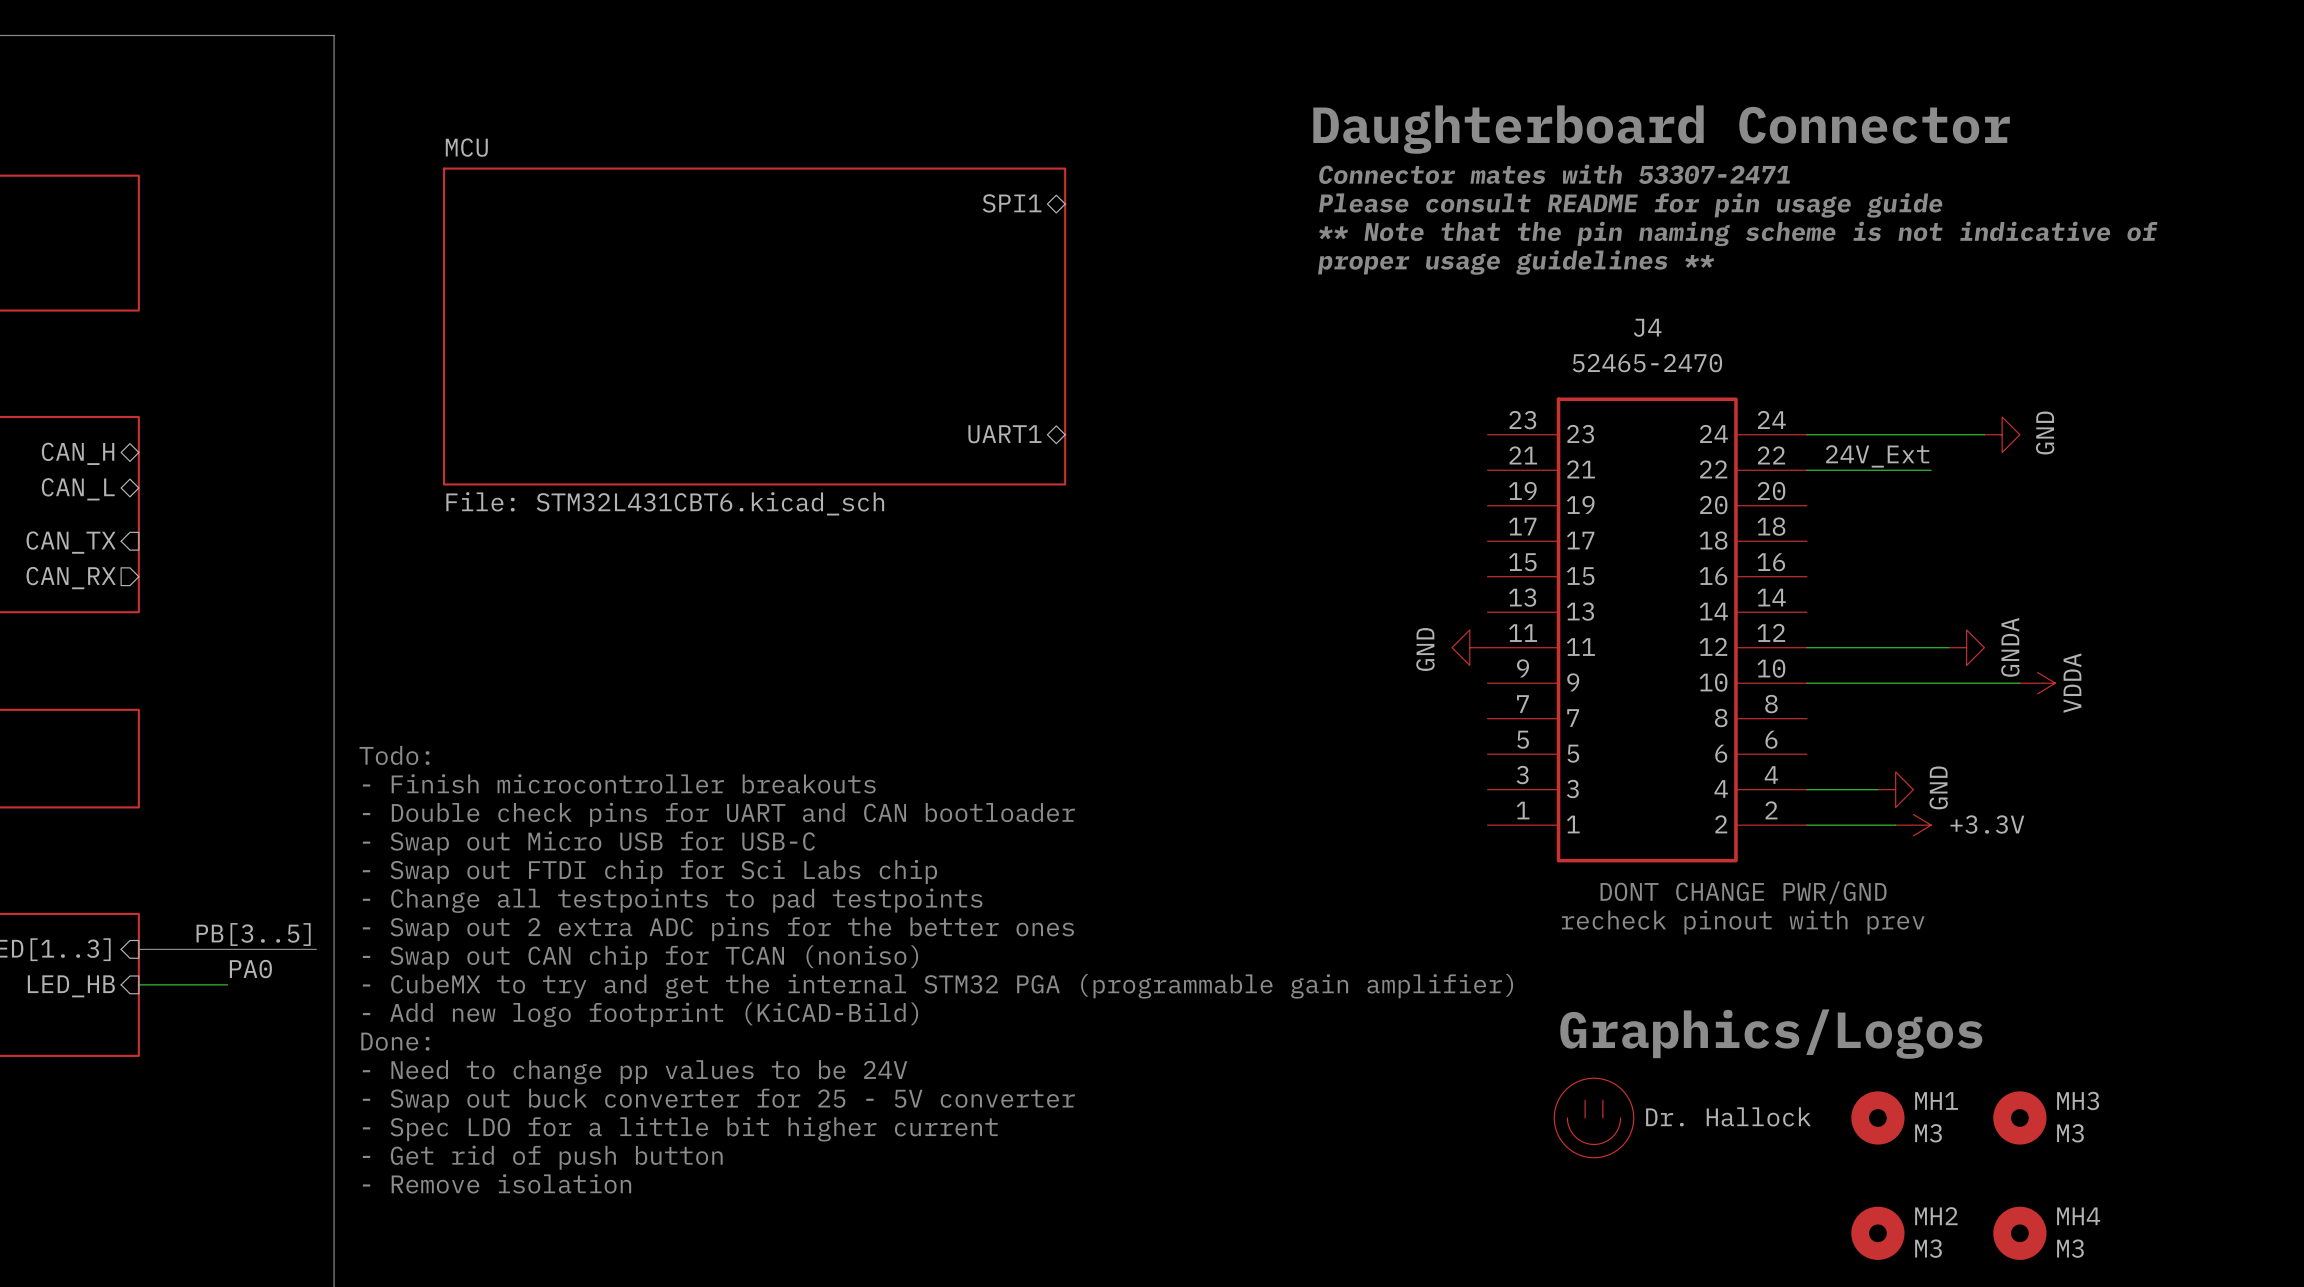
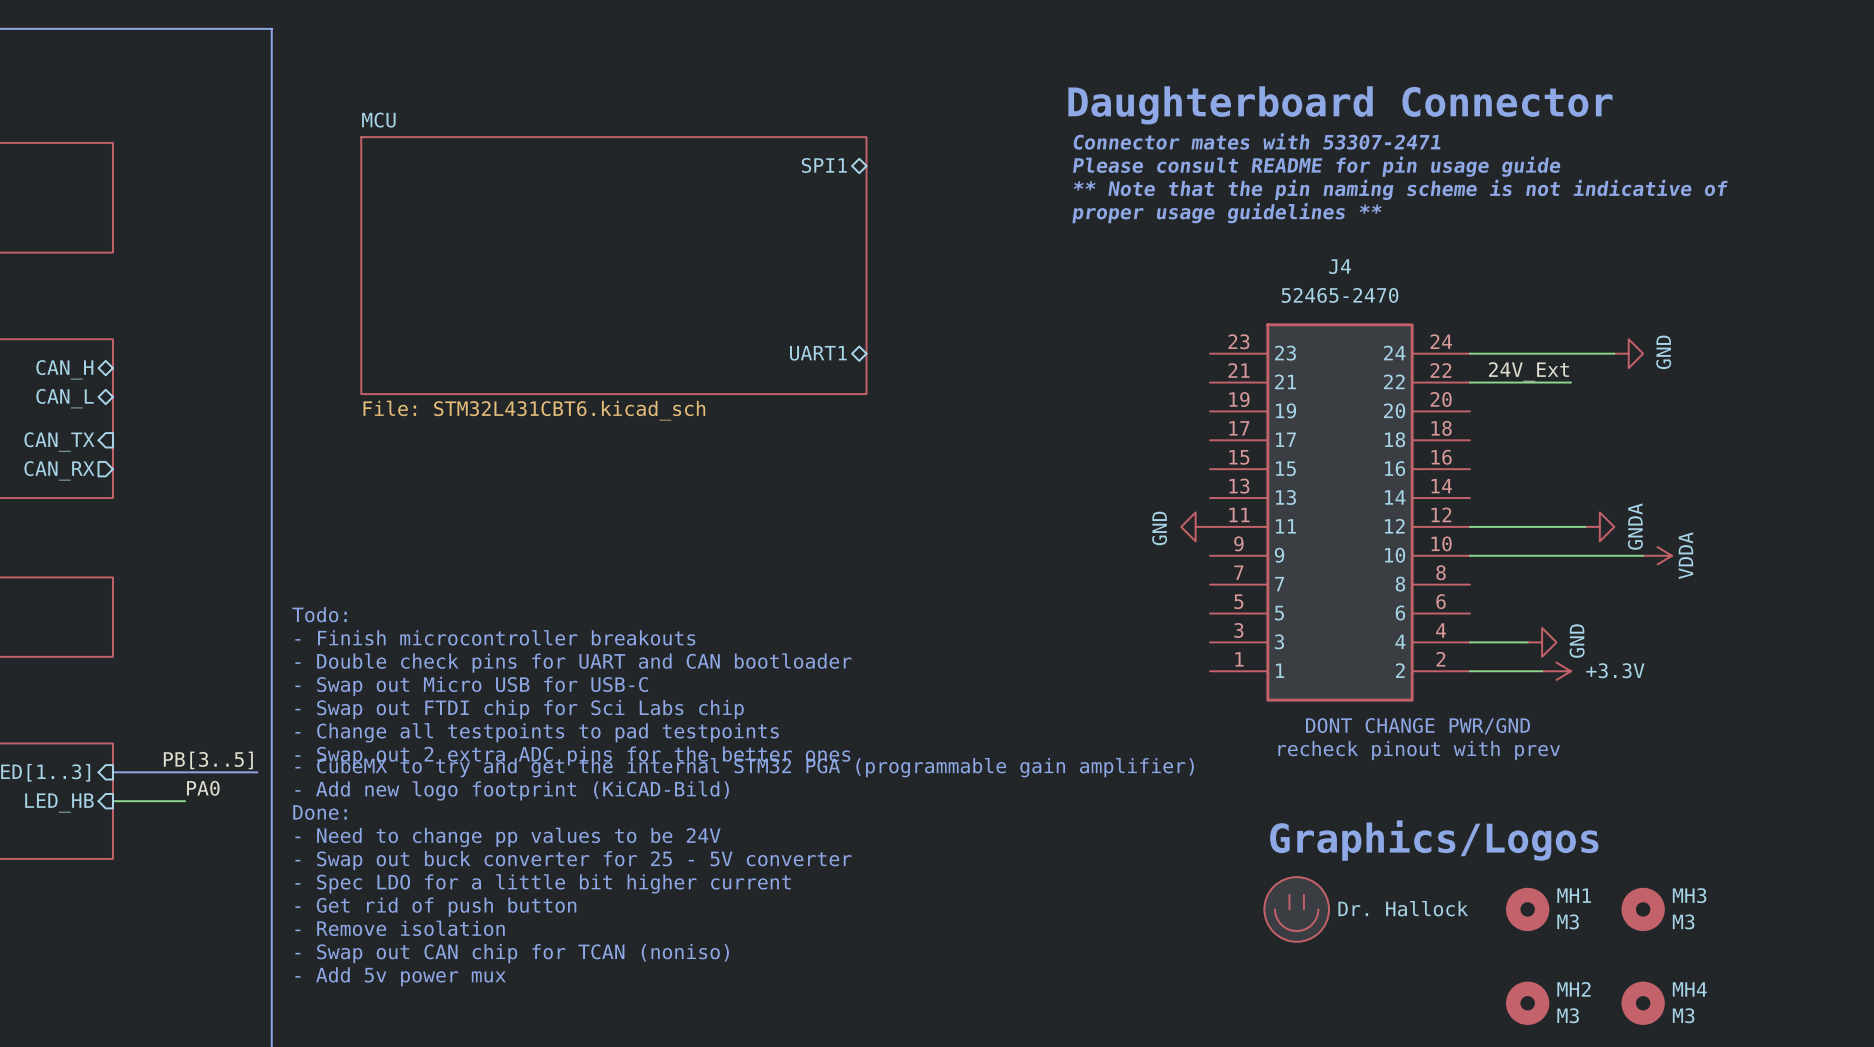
text position: - Swap out CAN chip for TCAN (noniso) (640, 957) -> - Swap out CAN chip for TCAN (noniso) (512, 953)
text position: - CubeMX to try and get the internal STM32 PGA (programmable gain amplifier) (937, 986) -> - CubeMX to try and get the internal STM32 PGA (programmable gain amplifier) (744, 767)
text position: - Add new logo footprint (KiCAD-Bild) (640, 1014) -> - Add new logo footprint (KiCAD-Bild) (512, 790)
text position: Done: (395, 1041) -> Done: (320, 812)
text position: - Need to change pp values to be 24V (635, 1072) -> - Need to change pp values to be 24V (507, 837)
text position: - Swap out buck converter for 25 - 5V converter (718, 1100) -> - Swap out buck converter for 25 - 5V converter (573, 860)
text position: - Spec LDO for a little bit higher current (680, 1129) -> - Spec LDO for a little bit higher current (543, 883)
text position: - Get rid of push button (542, 1157) -> - Get rid of push button (435, 907)
text position: - Remove isolation (496, 1183) -> - Remove isolation (400, 928)
text: none -> - Add 5v power mux (400, 976)

